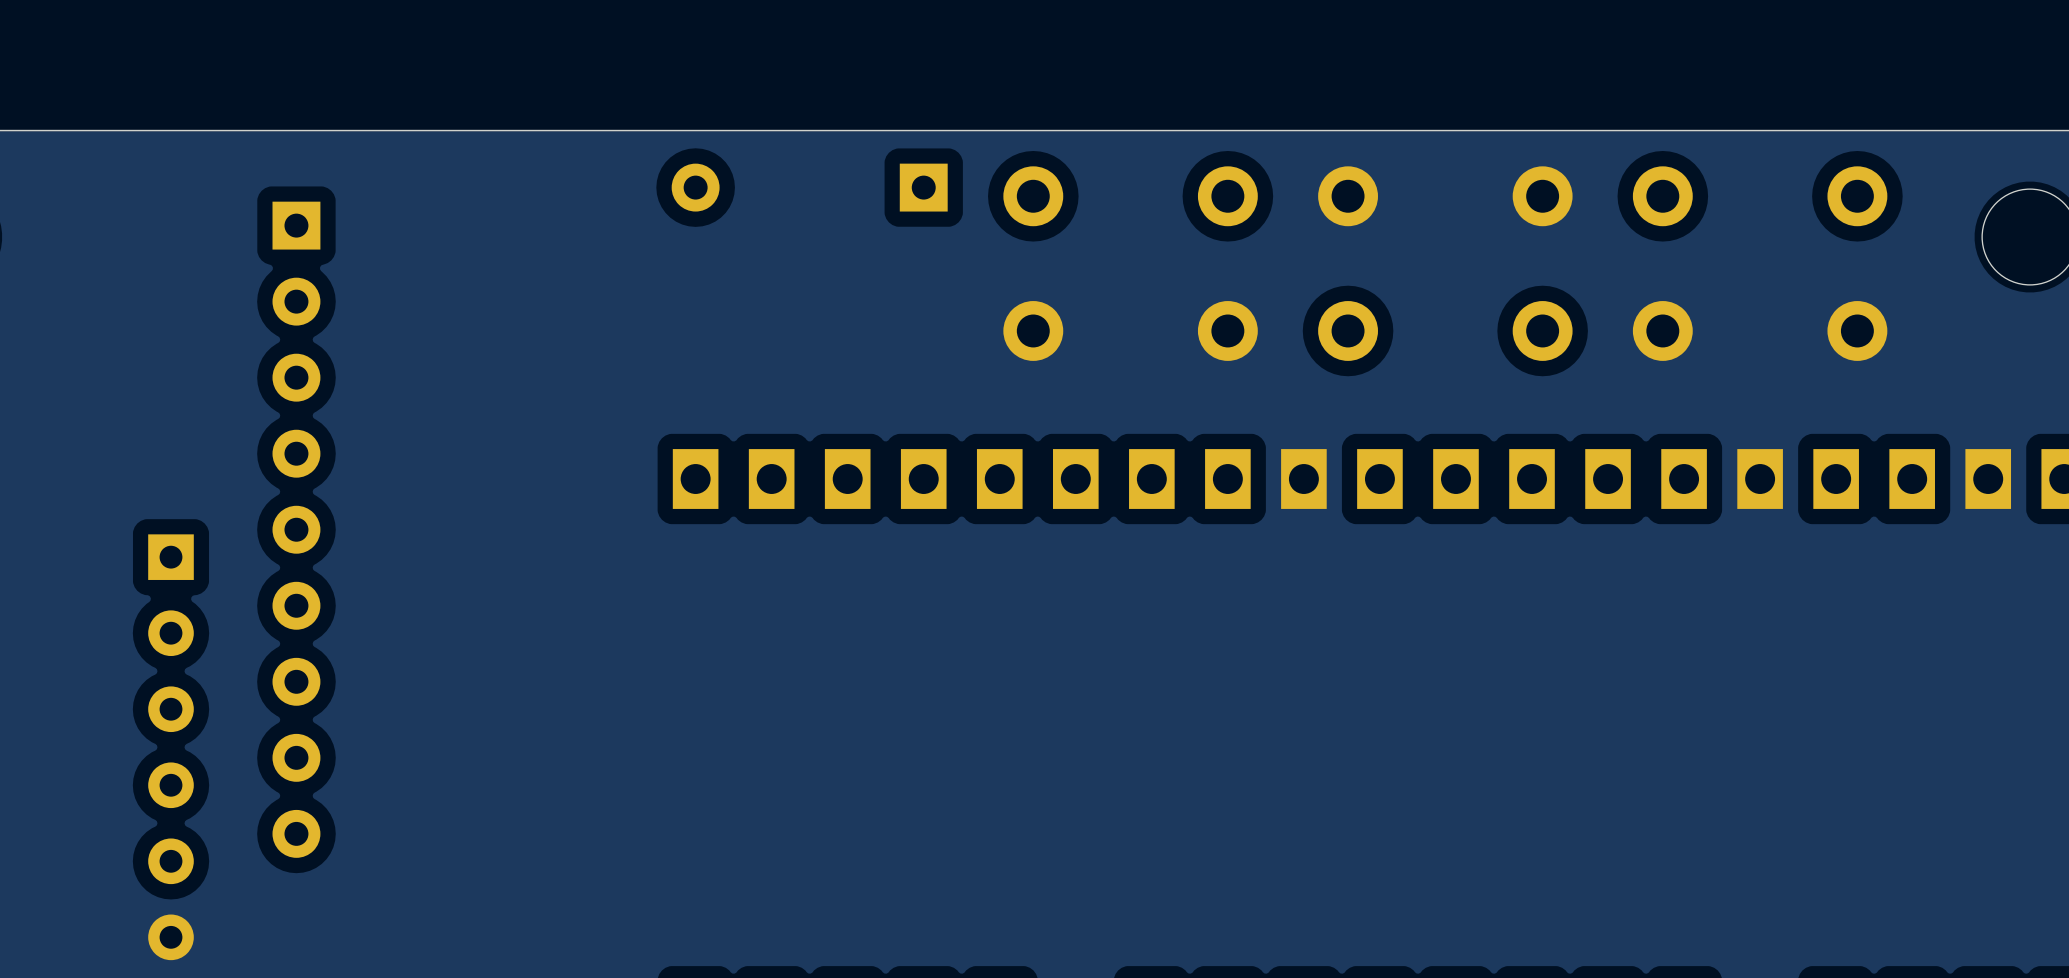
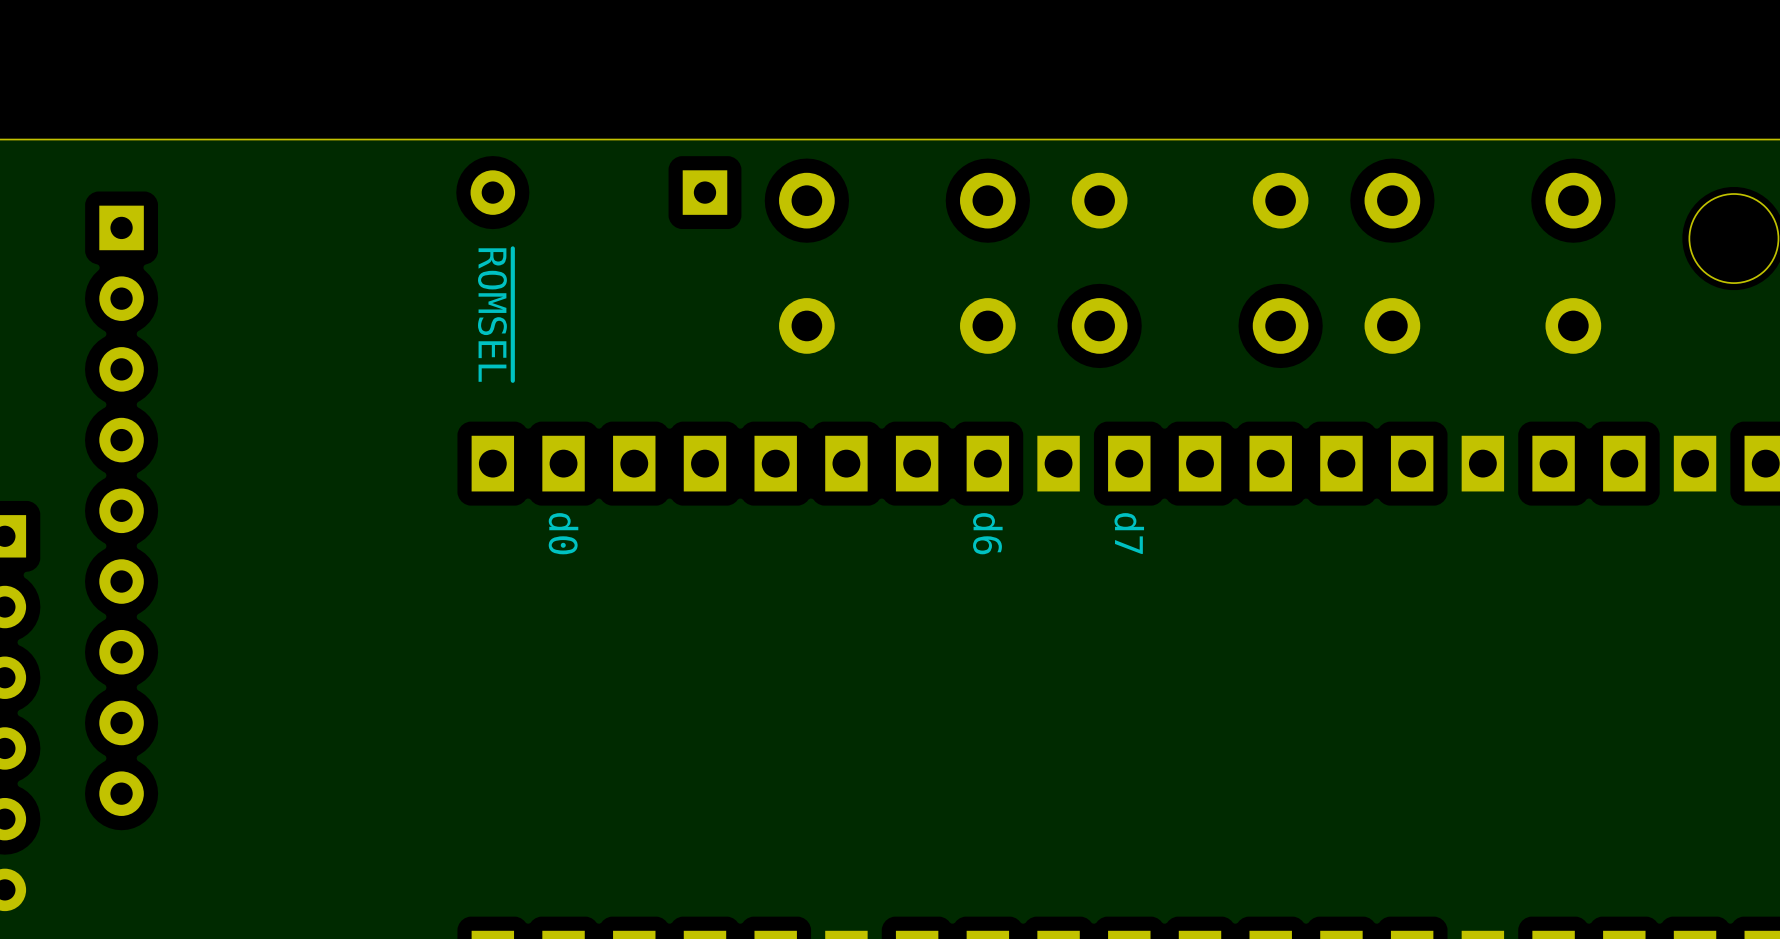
text: none -> ~{ROMSEL} (495, 315)
text: none -> d6 (987, 533)
text: none -> d7 (1129, 533)
text: none -> d0 (563, 533)

